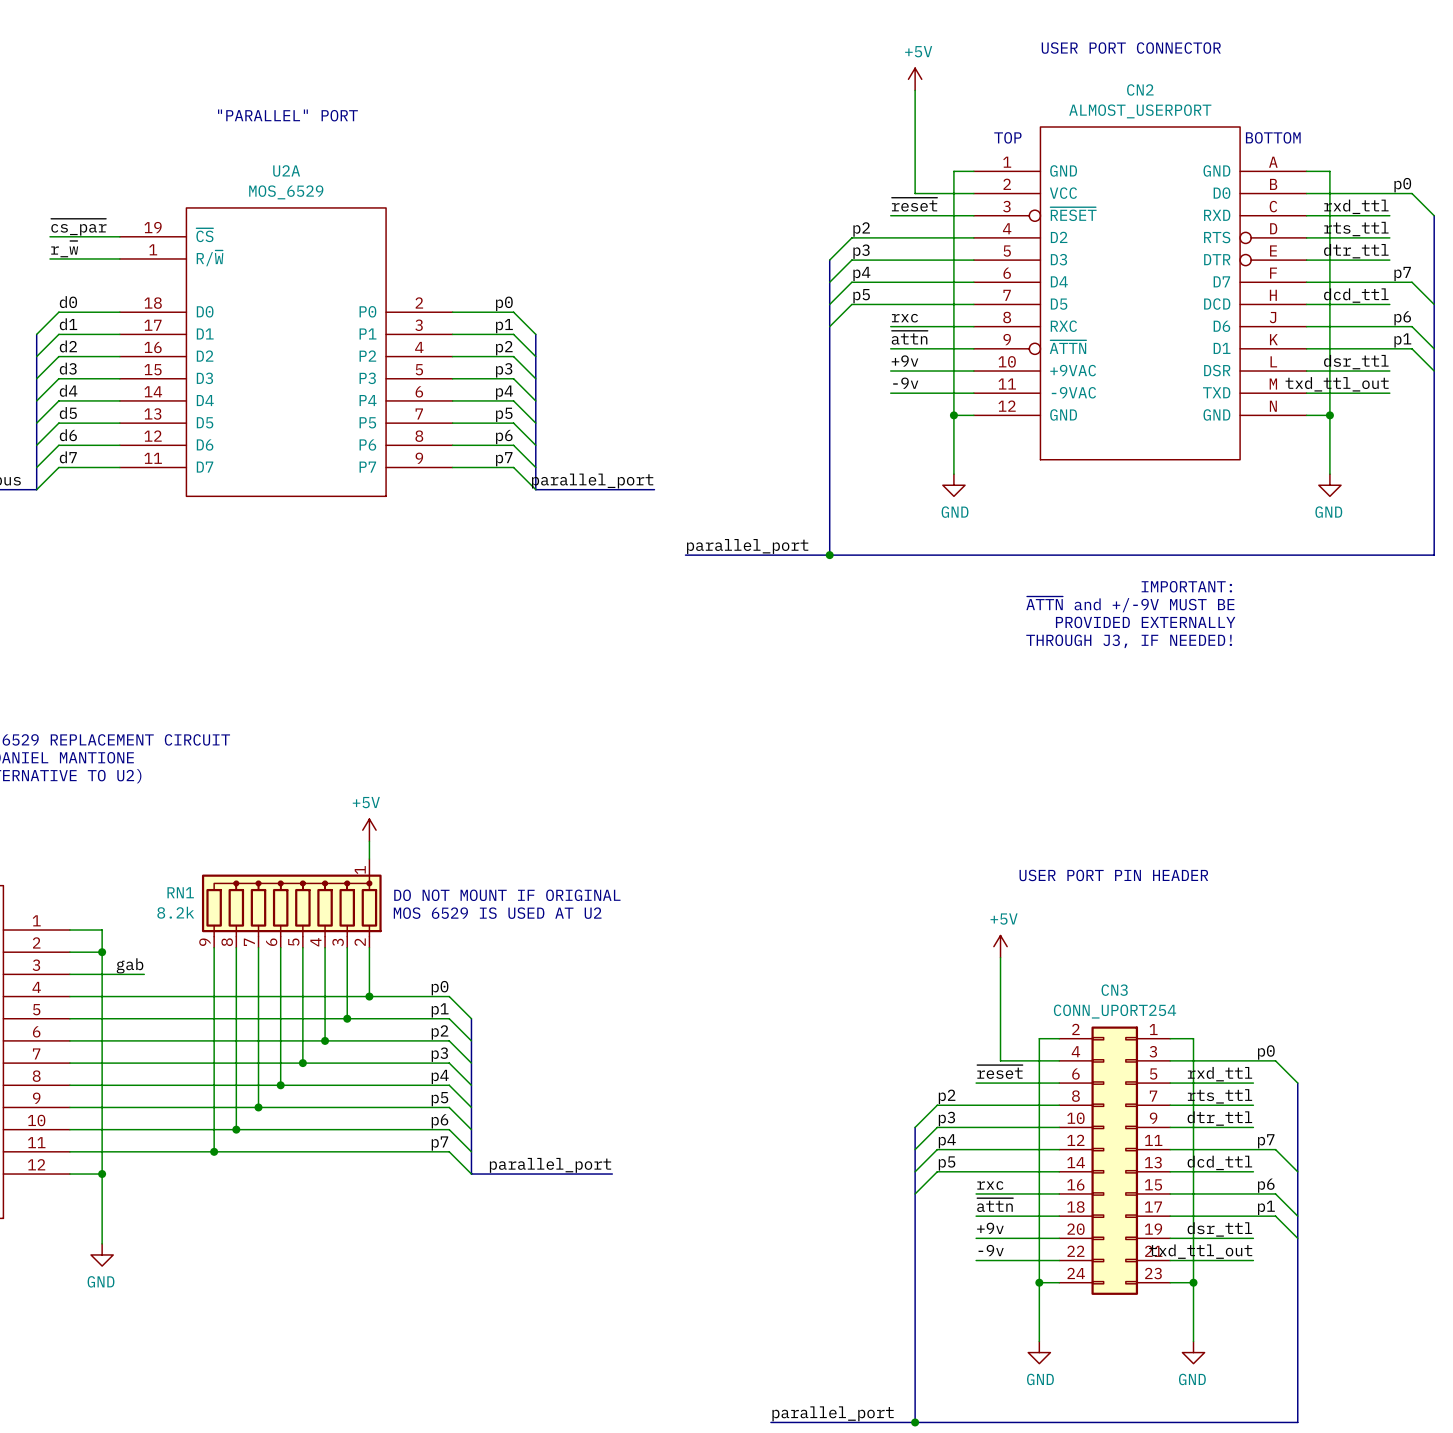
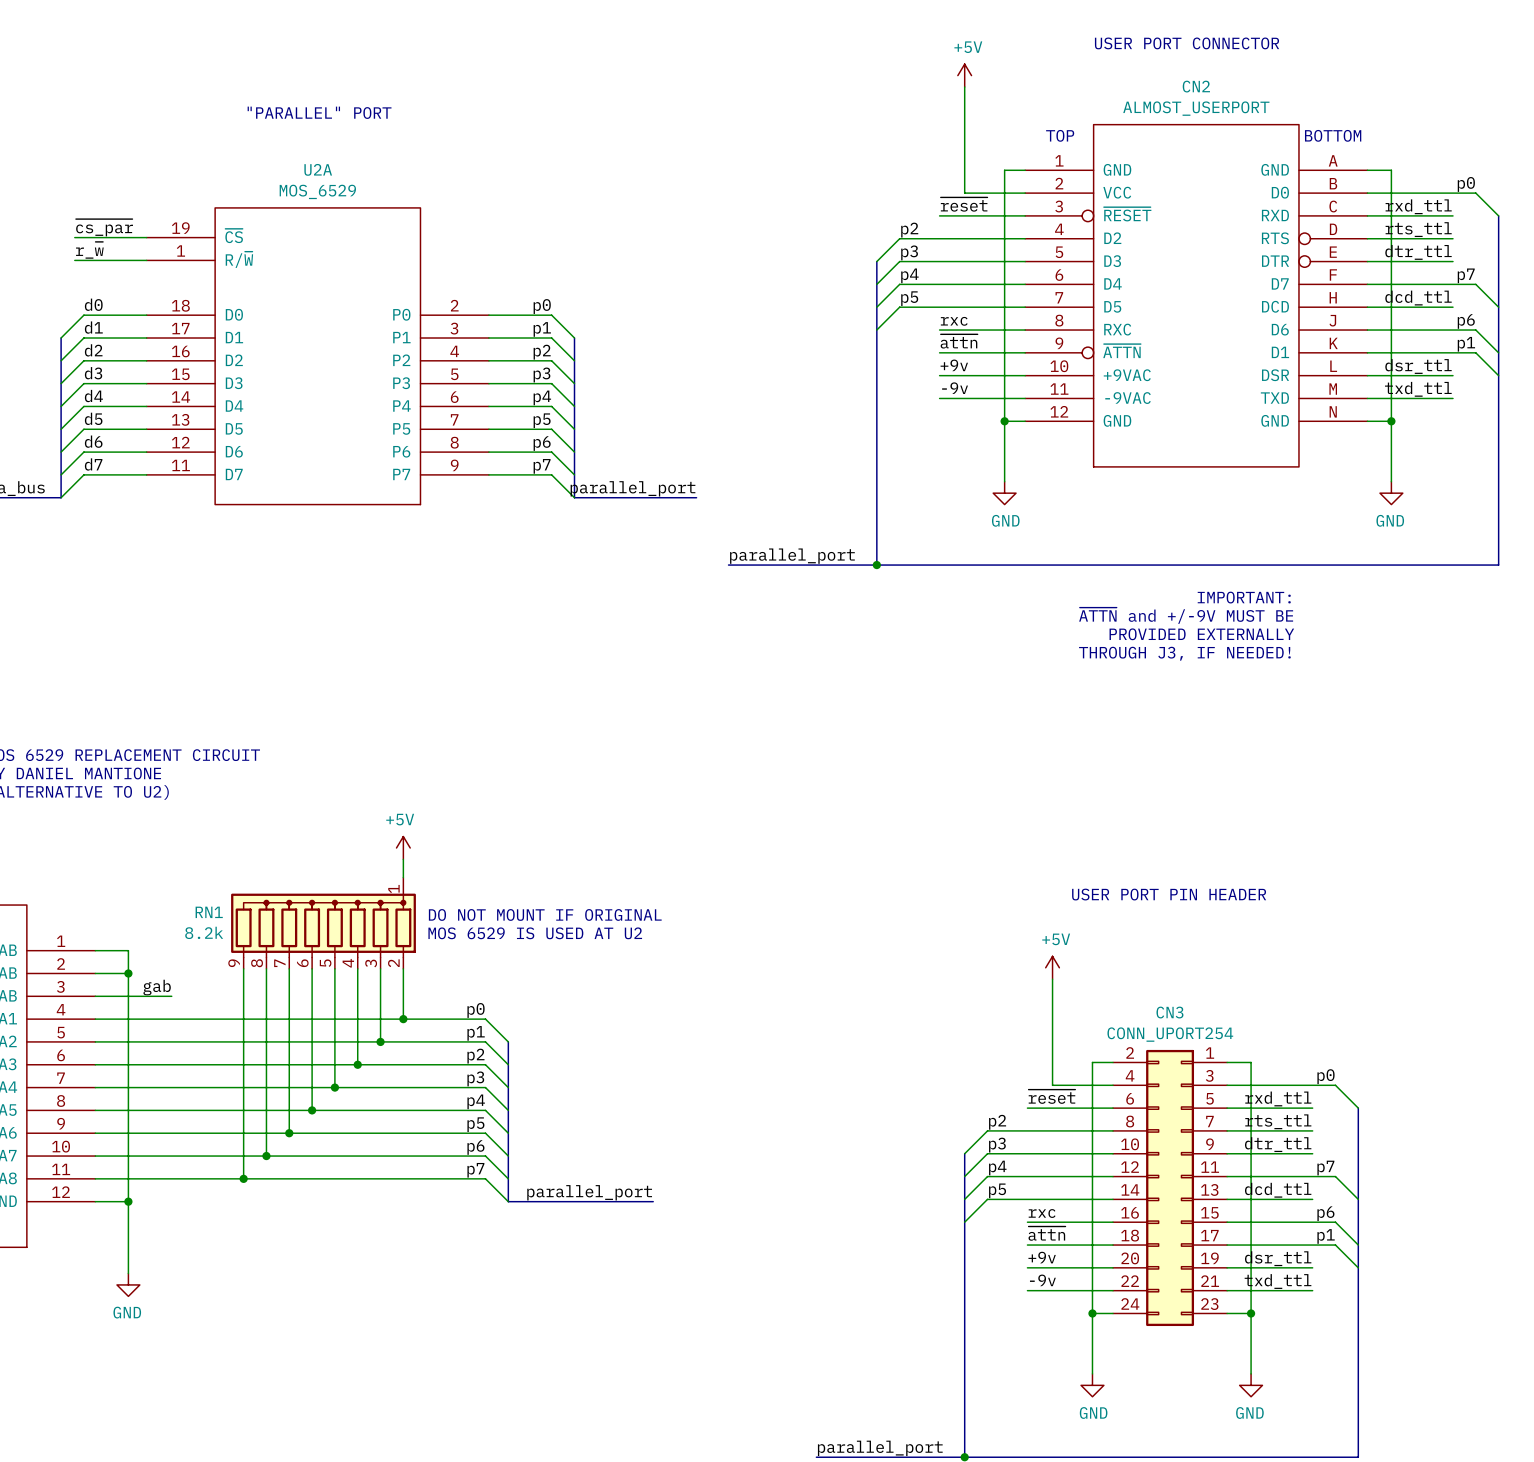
label: txd_ttl_out (1337, 384) -> txd_ttl (1418, 389)
label: txd_ttl_out (1200, 1251) -> txd_ttl (1278, 1281)

